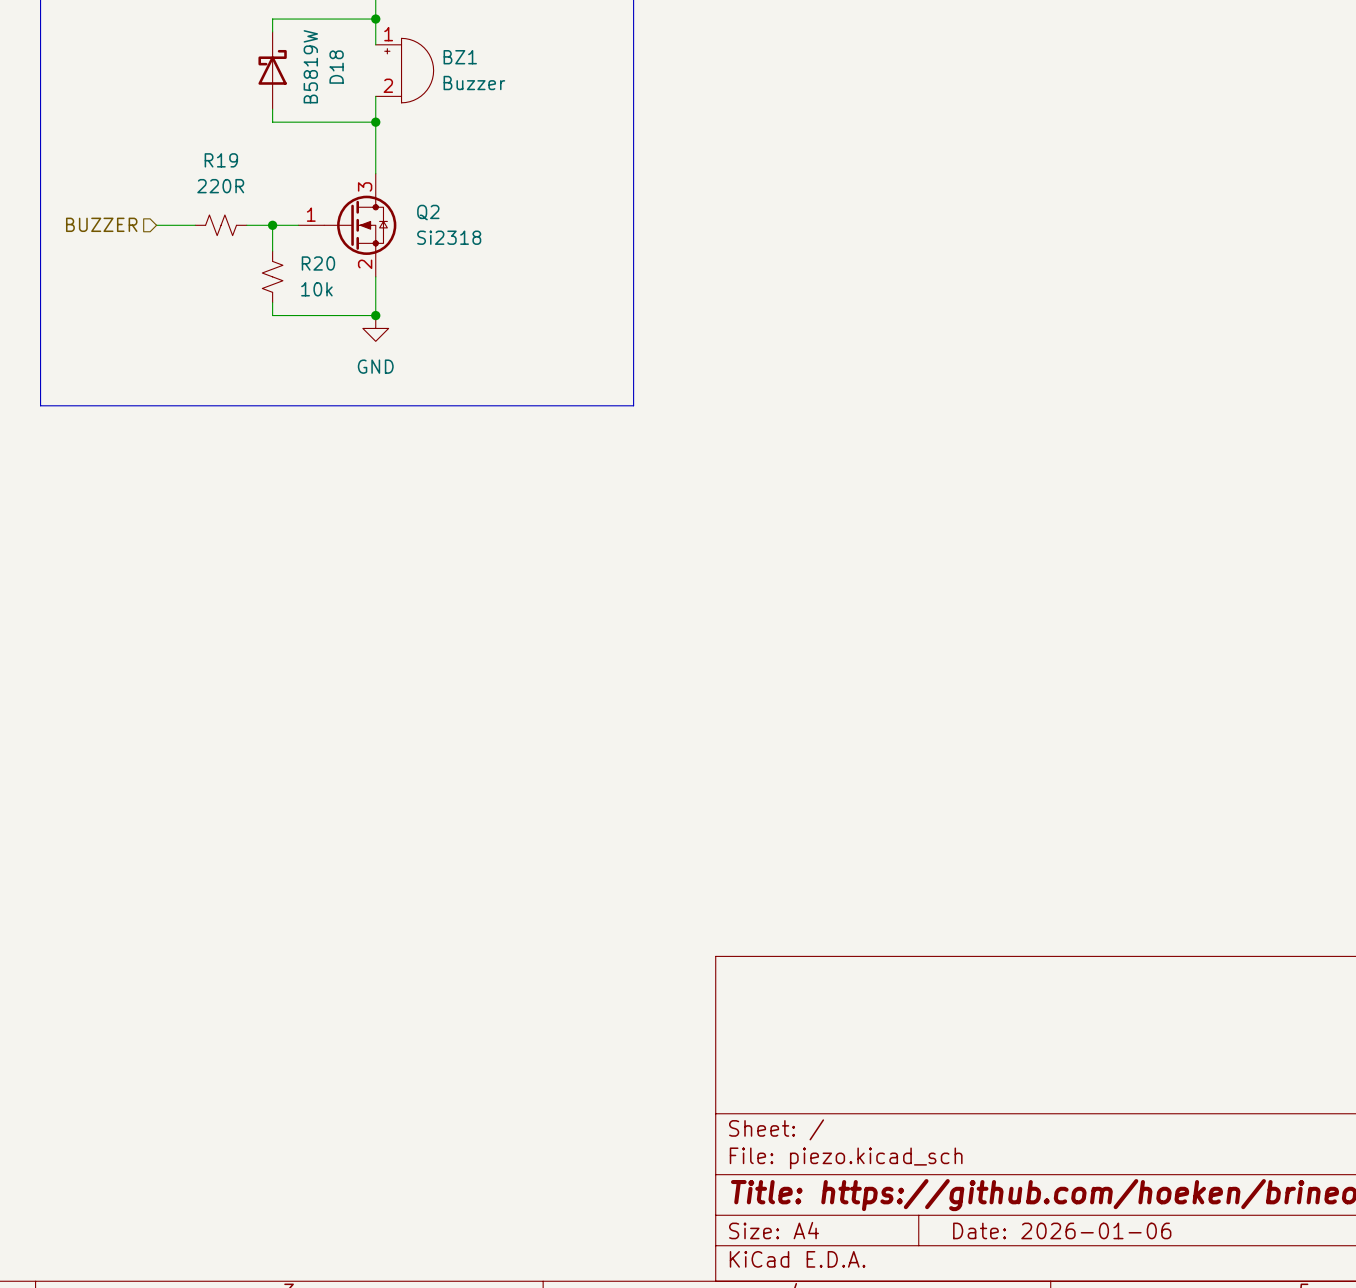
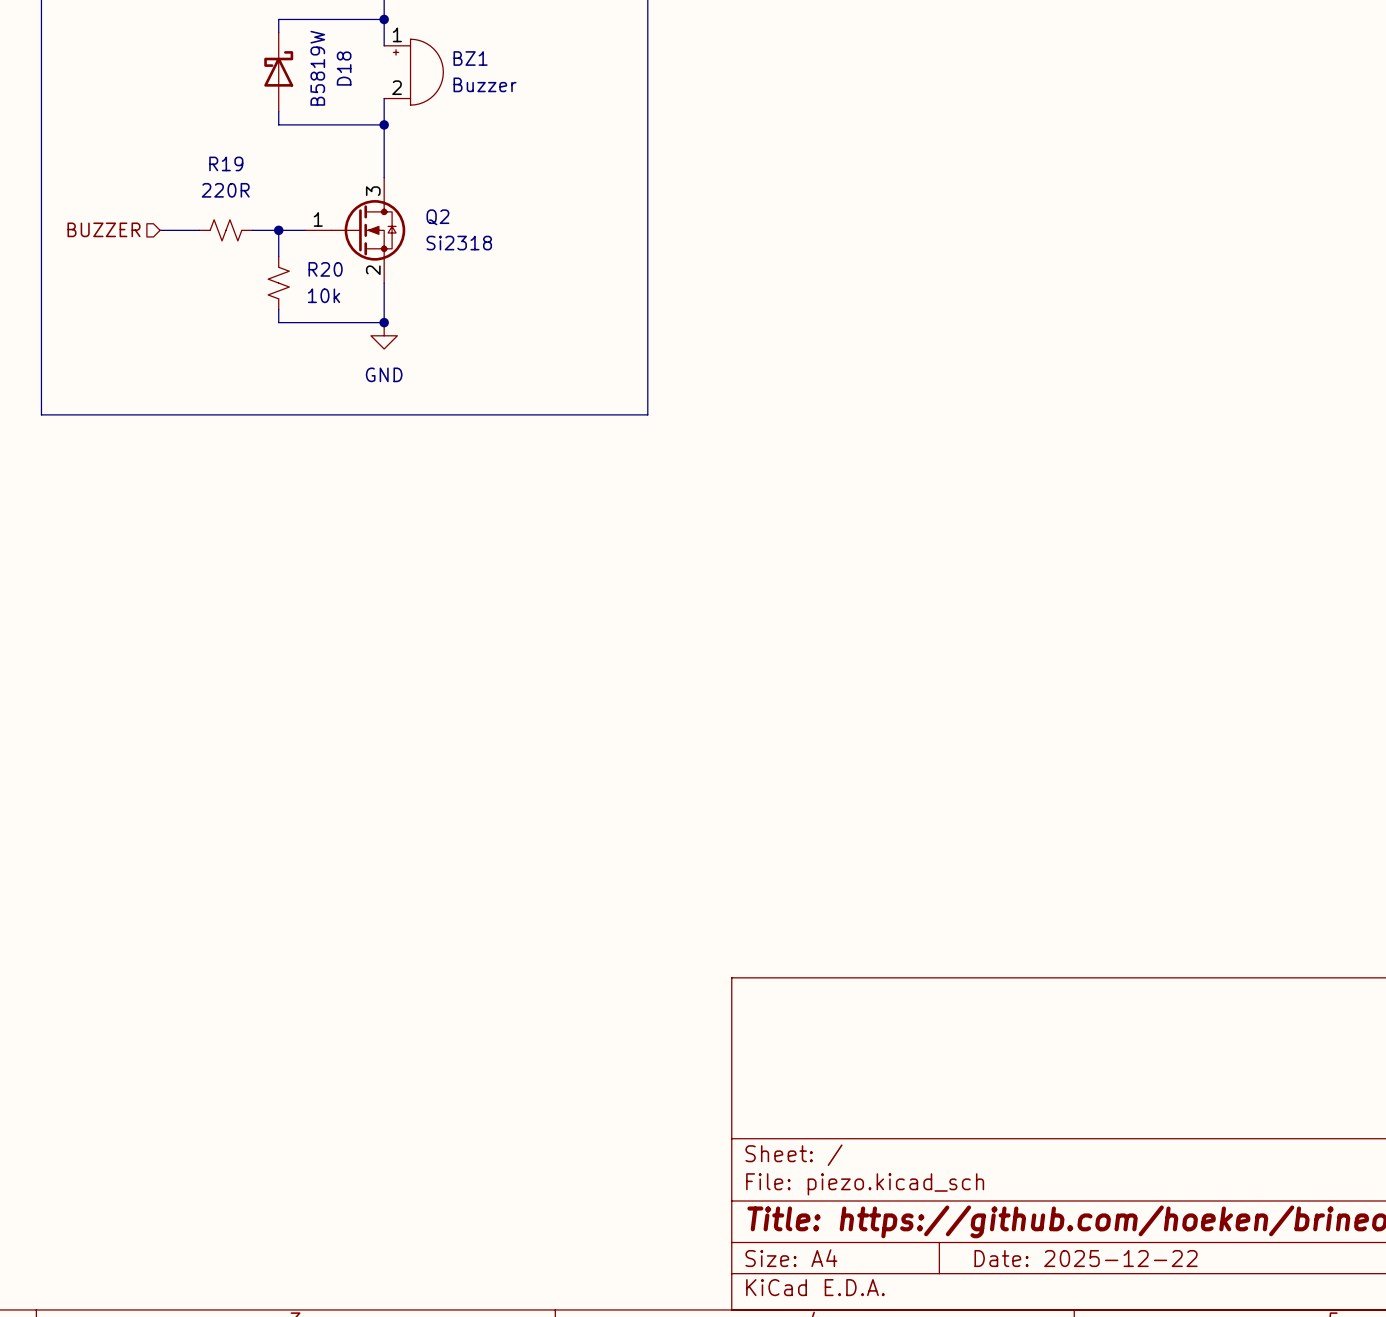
title block: Date: 2026-01-06 (1062, 1230) -> Date: 2025-12-22 (1086, 1258)

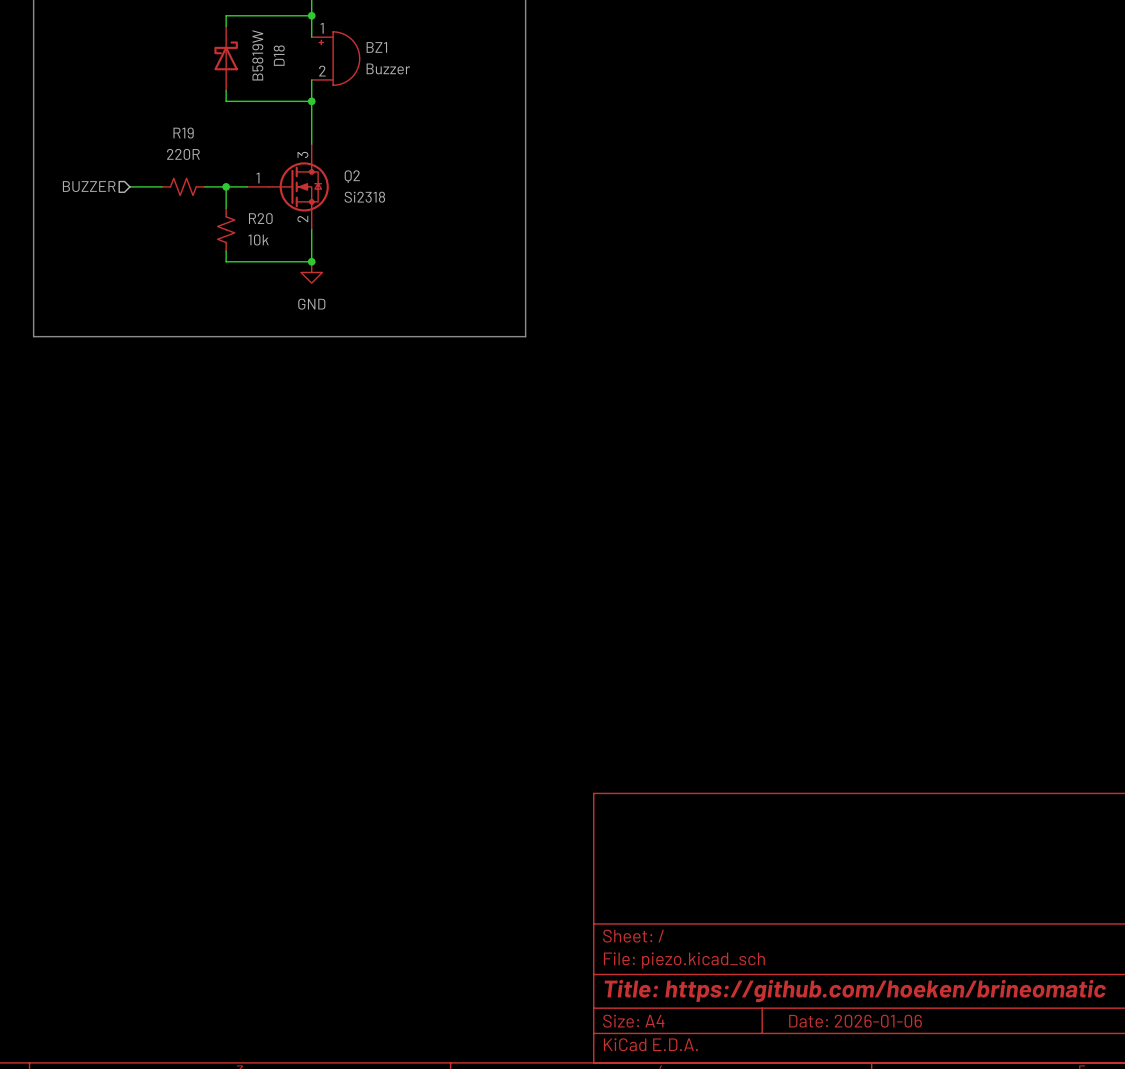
title block: Date: 2025-12-22 (1086, 1258) -> Date: 2026-01-06 (855, 1021)

